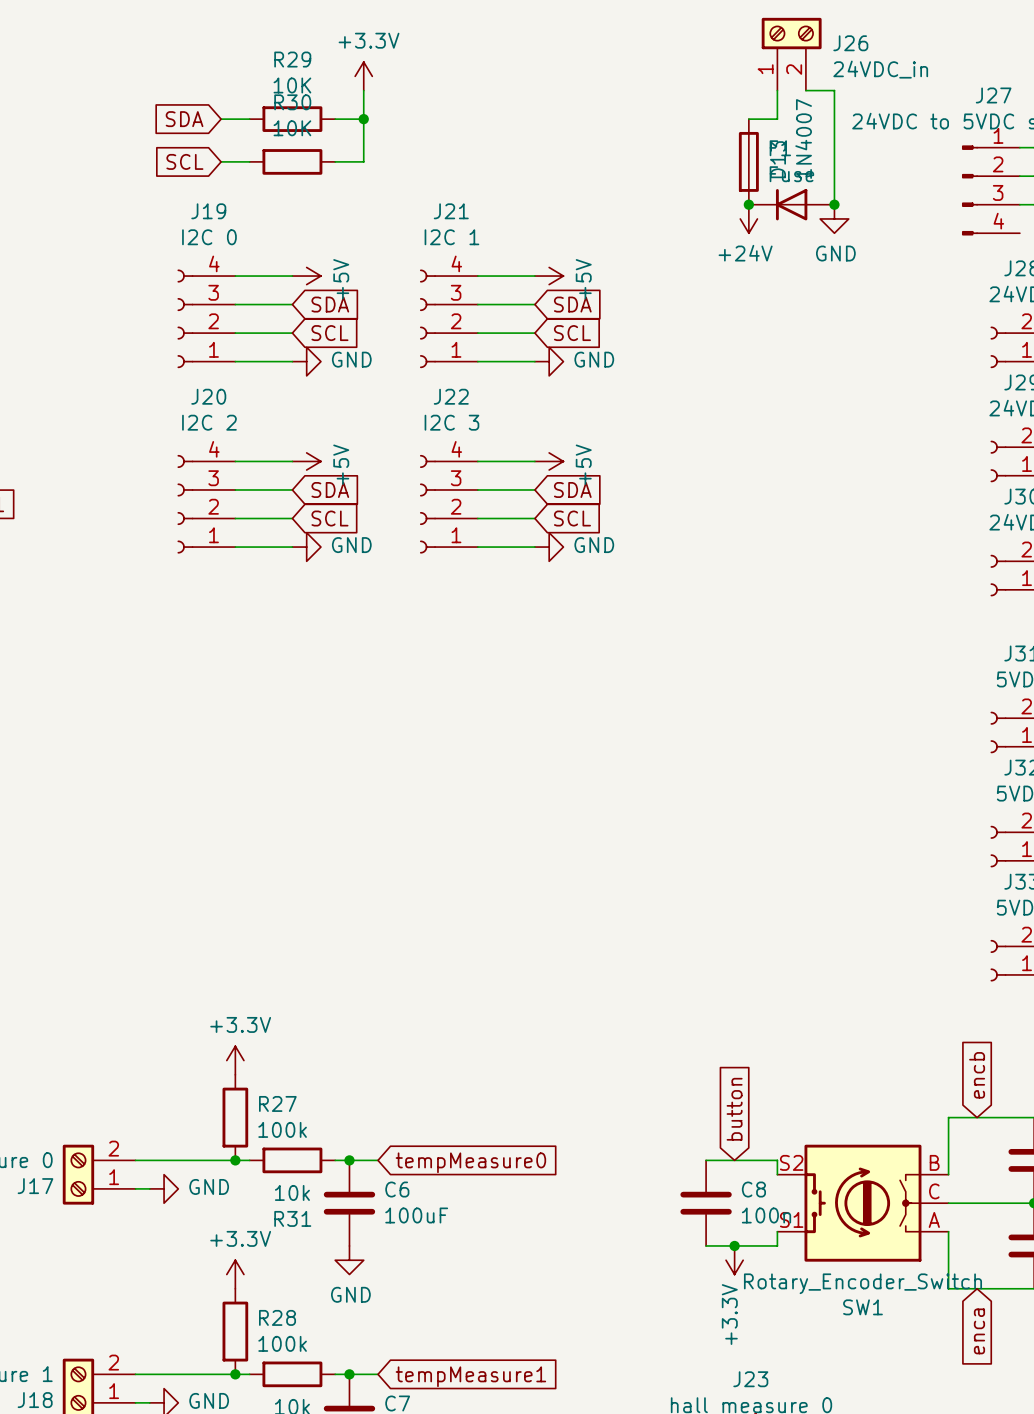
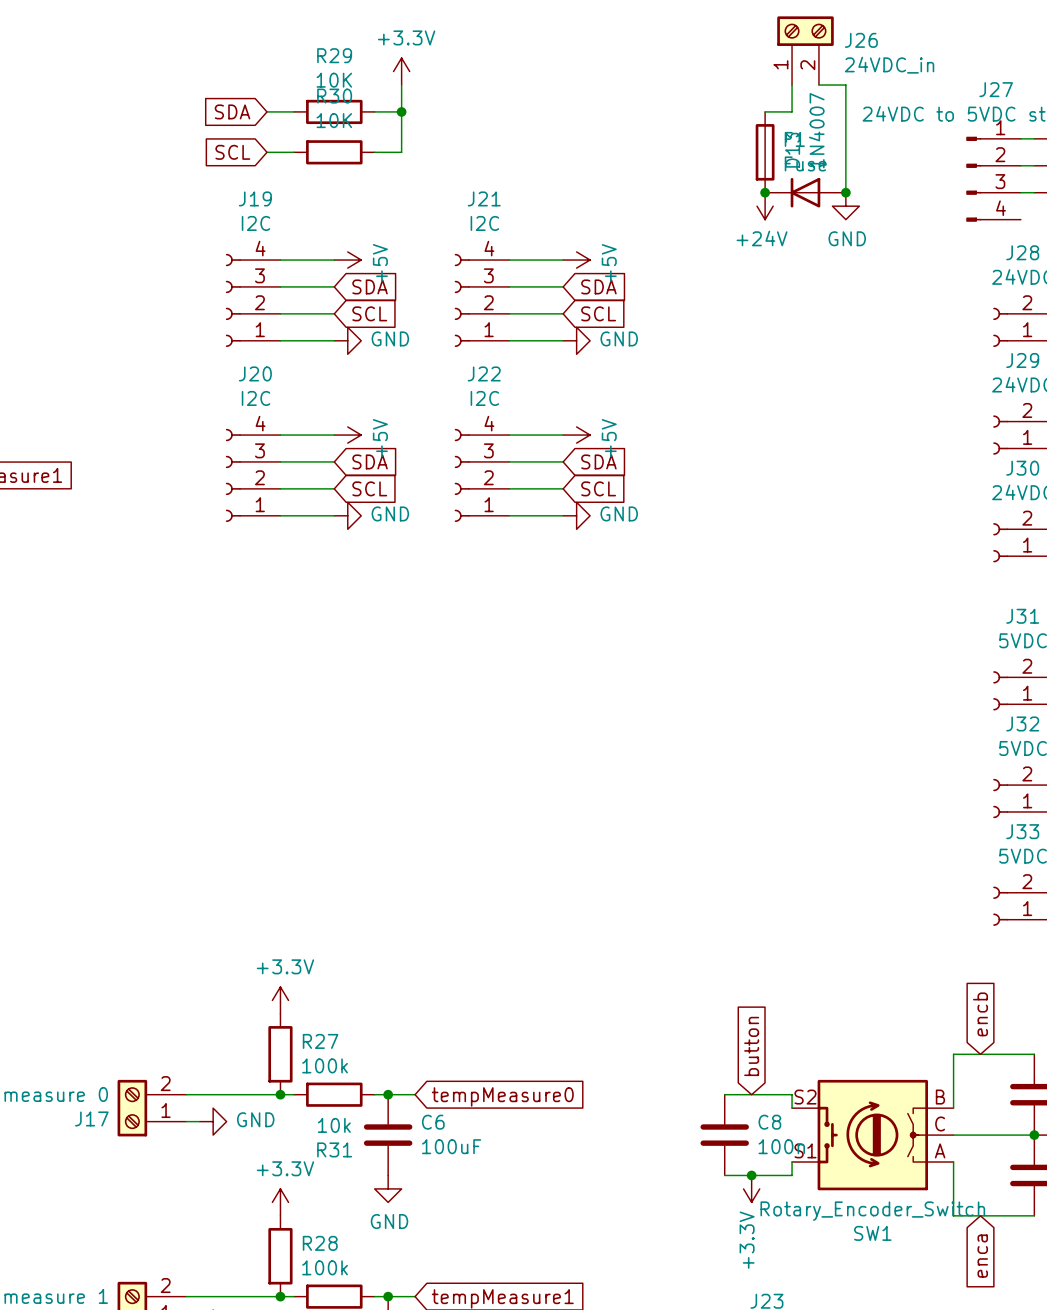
J19 value: I2C 0 (209, 237) -> I2C (256, 223)
J21 value: I2C 1 (451, 237) -> I2C (484, 223)
J20 value: I2C 2 (209, 422) -> I2C (256, 398)
J22 value: I2C 3 (451, 422) -> I2C (484, 398)

